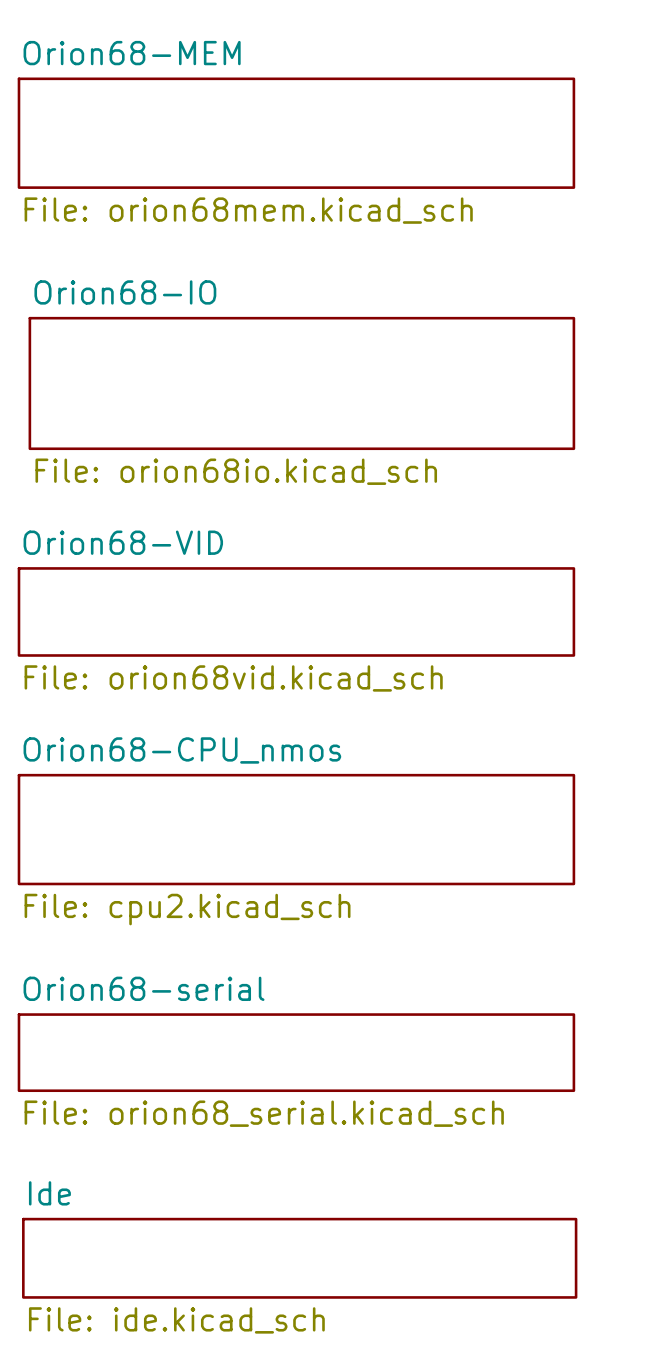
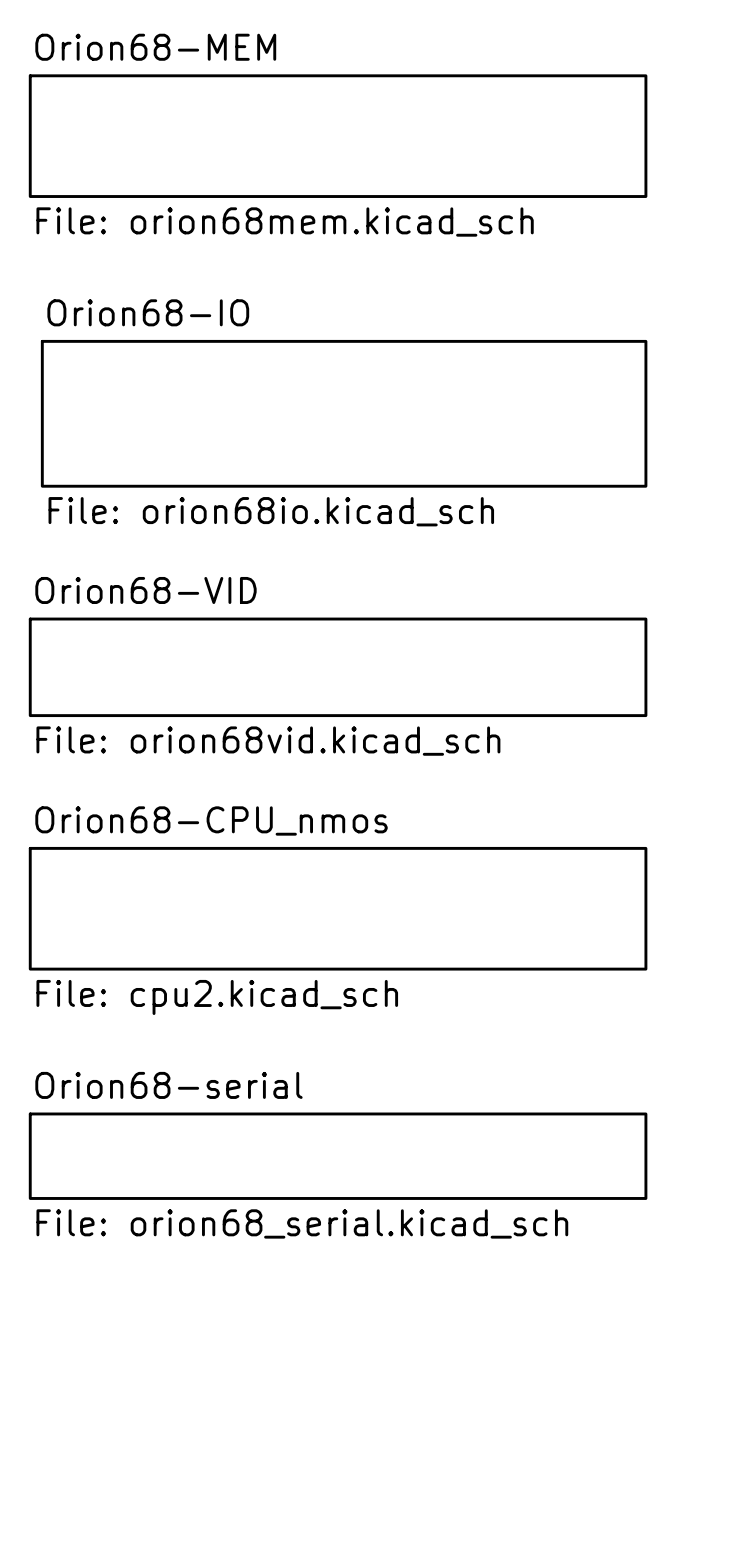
sheet Ide: File: ide.kicad_sch (299, 1258) -> none

